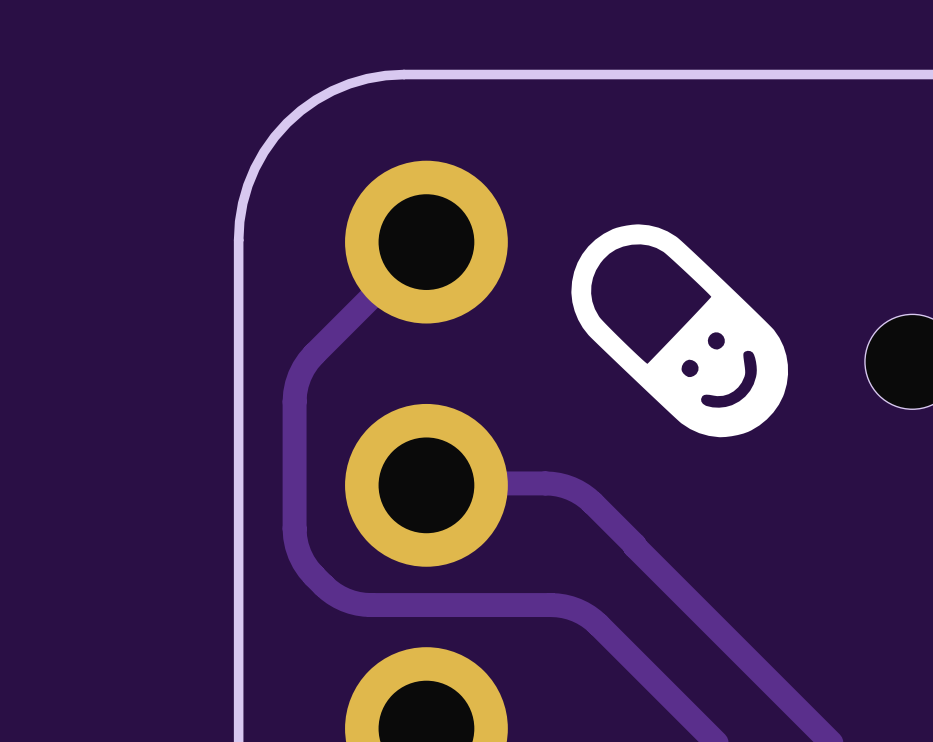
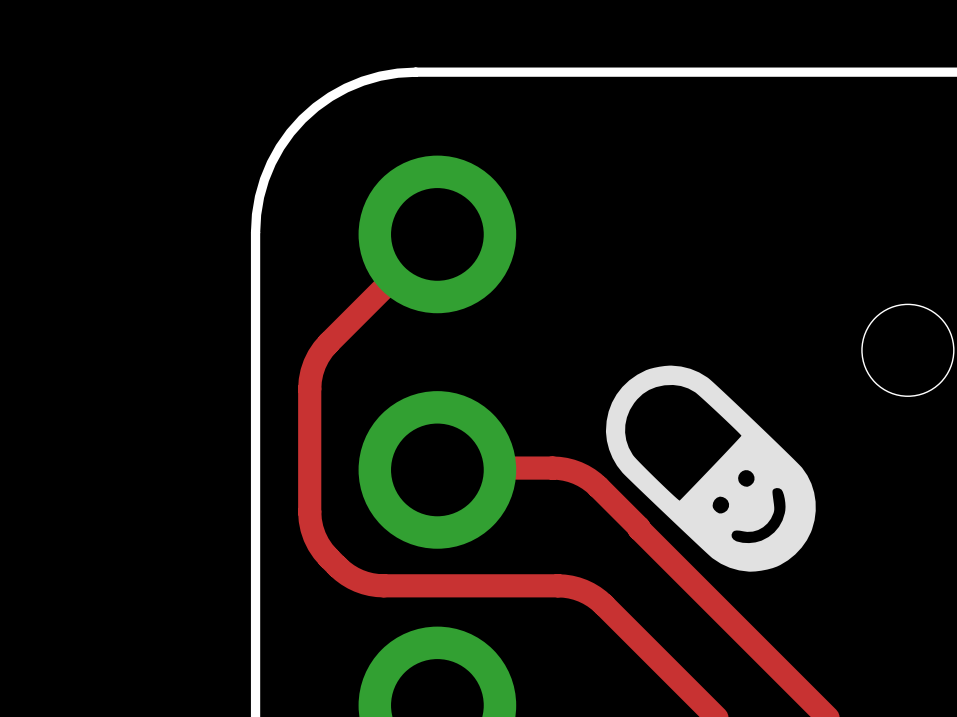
drawing position: (679, 330) -> (710, 468)

